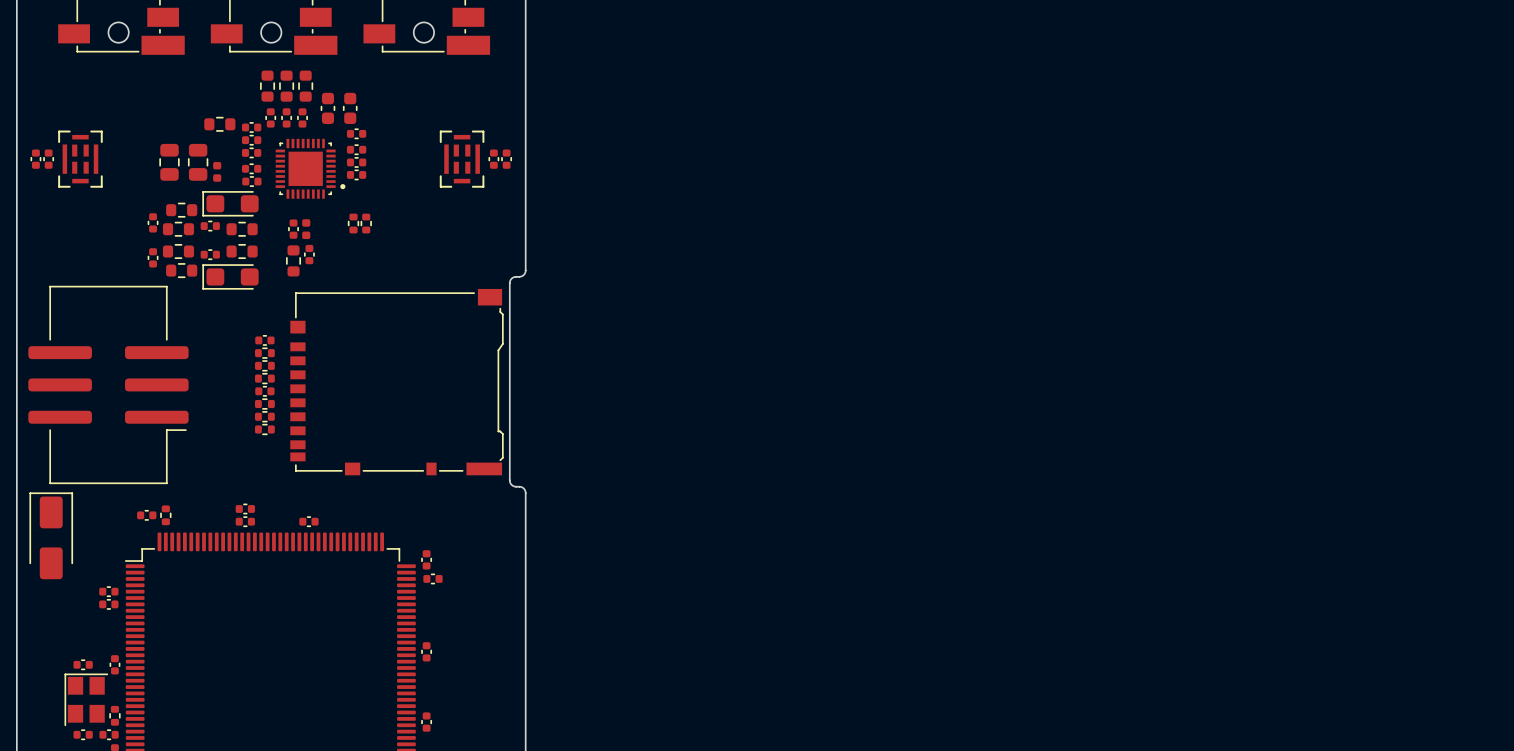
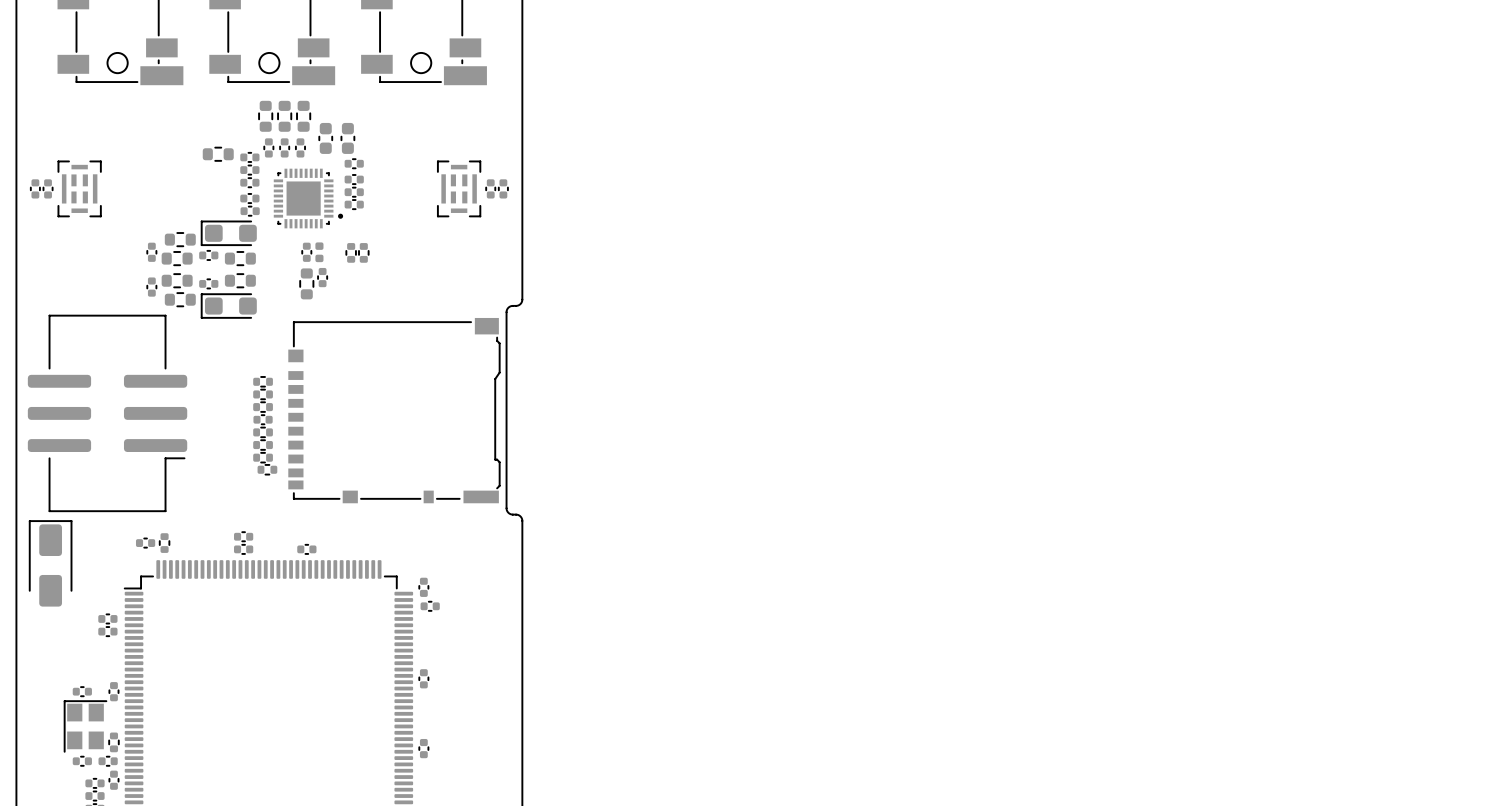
part: (169, 162) -> none
part: (198, 162) -> none
part position: (217, 171) -> (319, 252)
part footprint: [302, 219, 311, 240] -> [301, 242, 313, 262]
part position: (293, 229) -> (322, 277)
part footprint: [304, 244, 315, 265] -> [299, 268, 315, 300]
part: (293, 260) -> none
part: (264, 340) -> none
part: none -> (267, 469)

